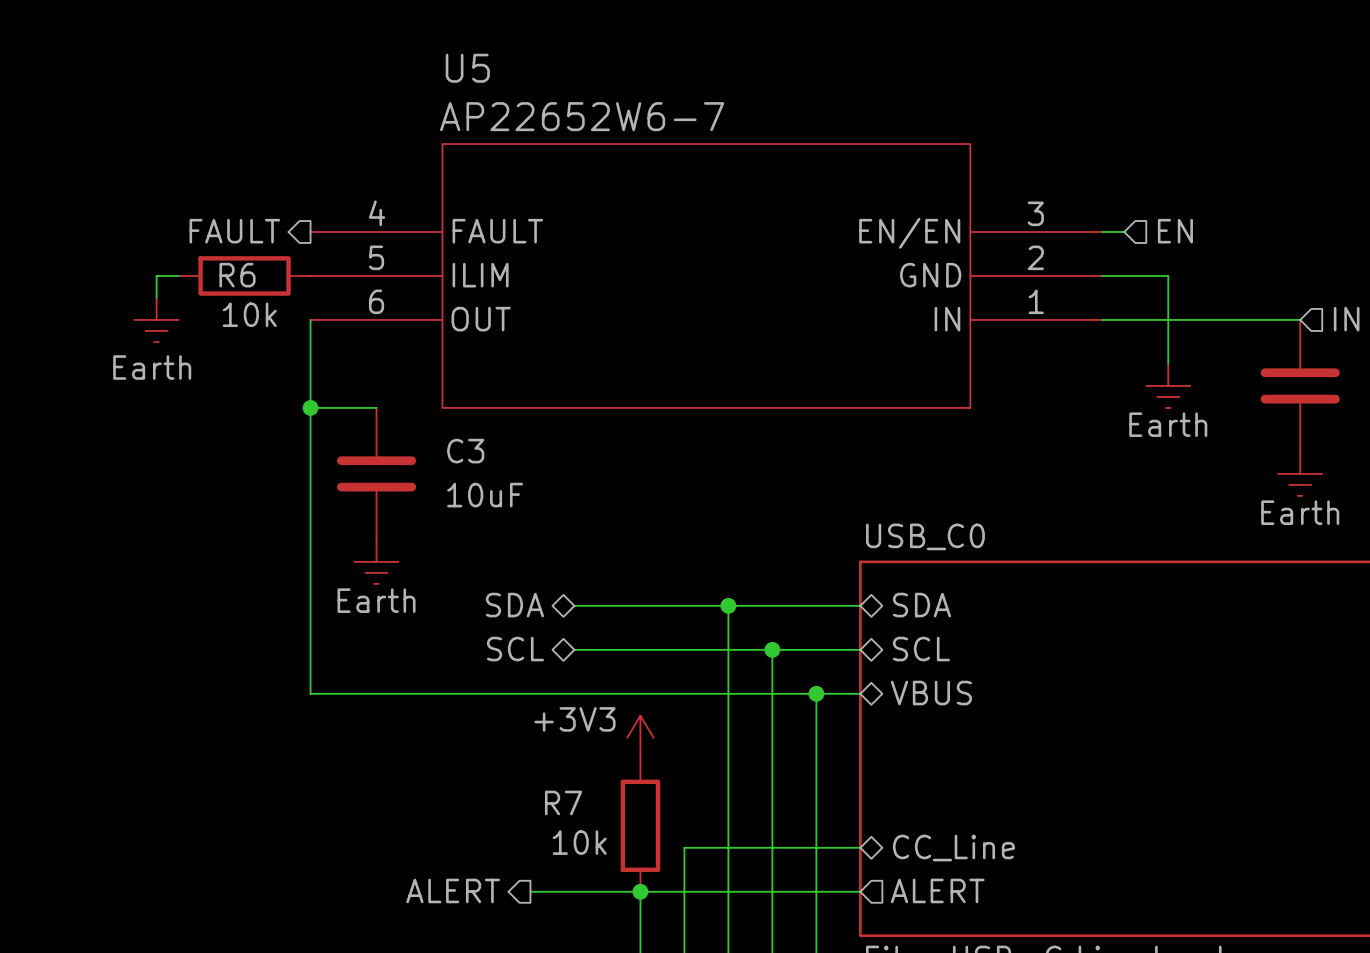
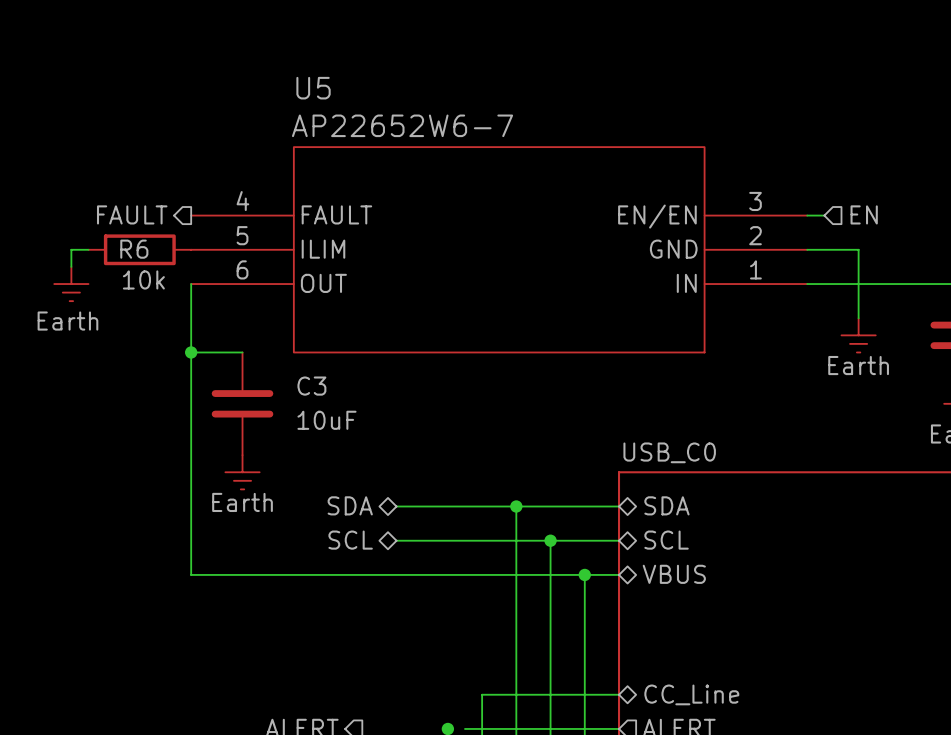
power symbol: +3V3 (640, 737) -> none
R7: 10k (640, 825) -> none
wire: (530, 891) (662, 891) -> none

